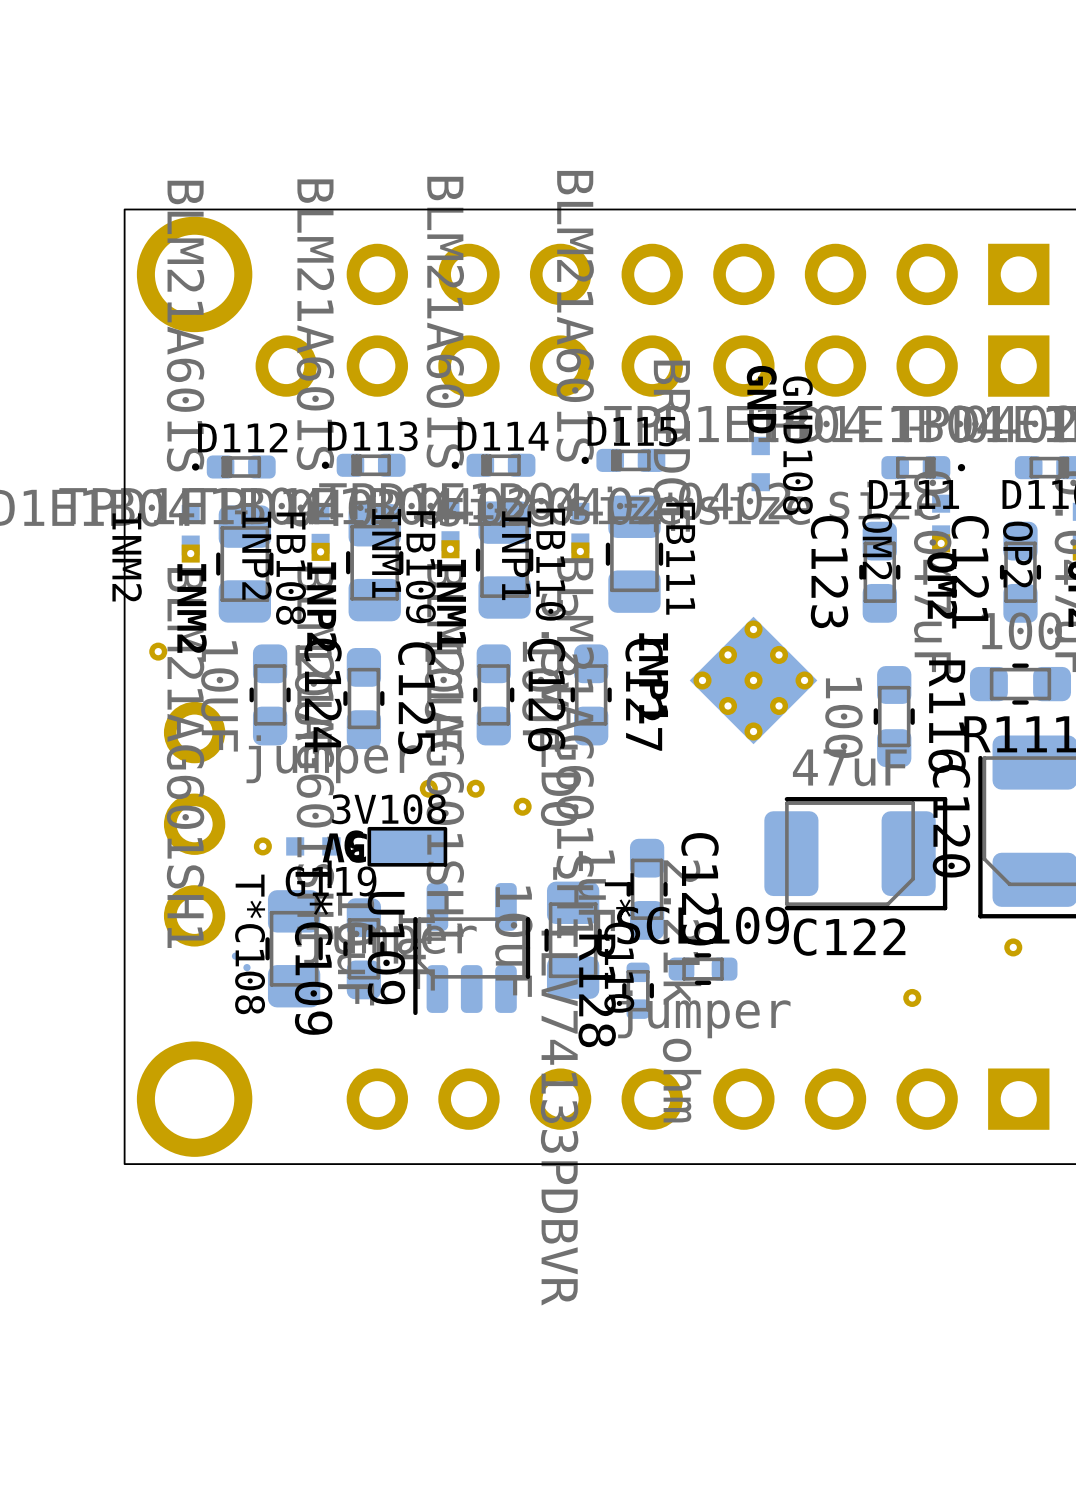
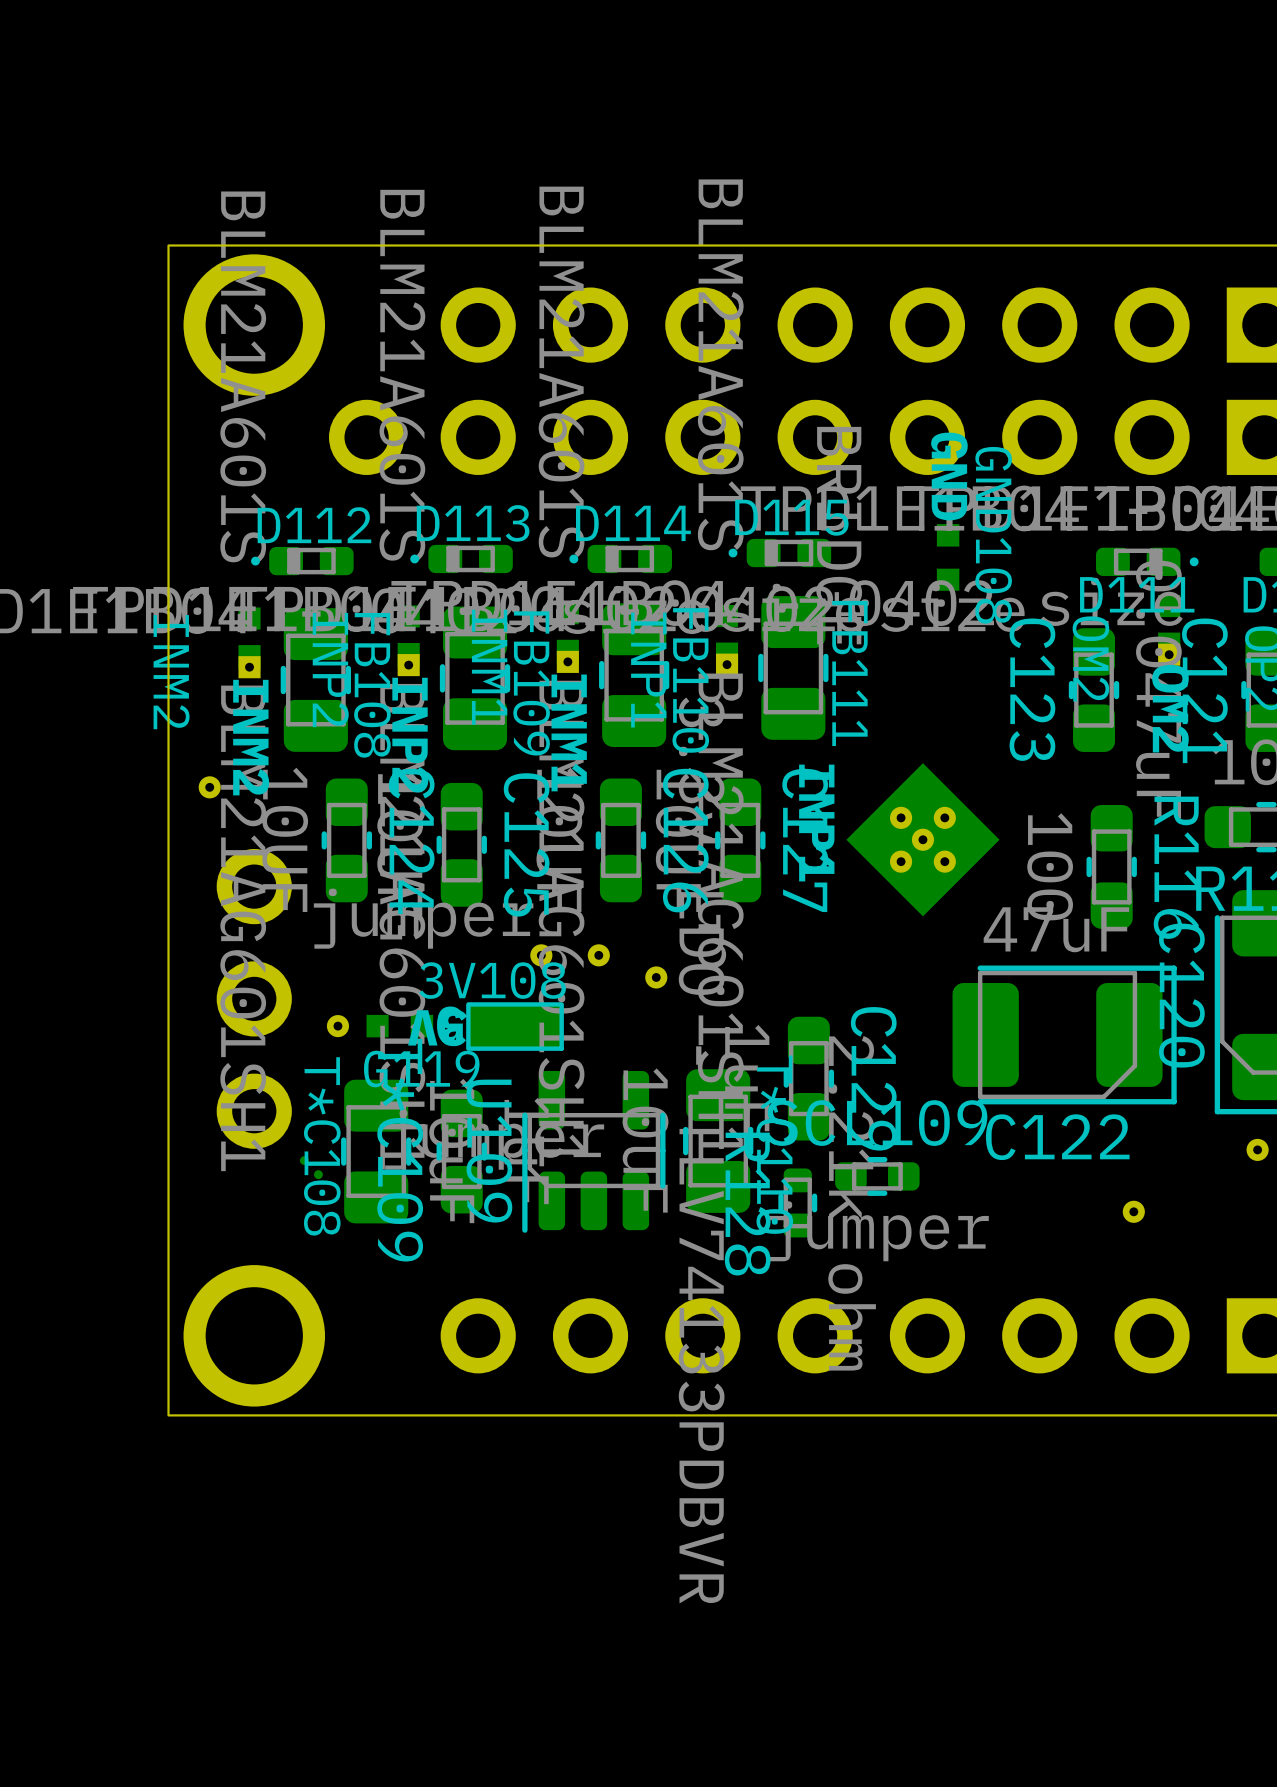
part footprint: [689, 616, 818, 745] -> [846, 763, 1000, 917]

